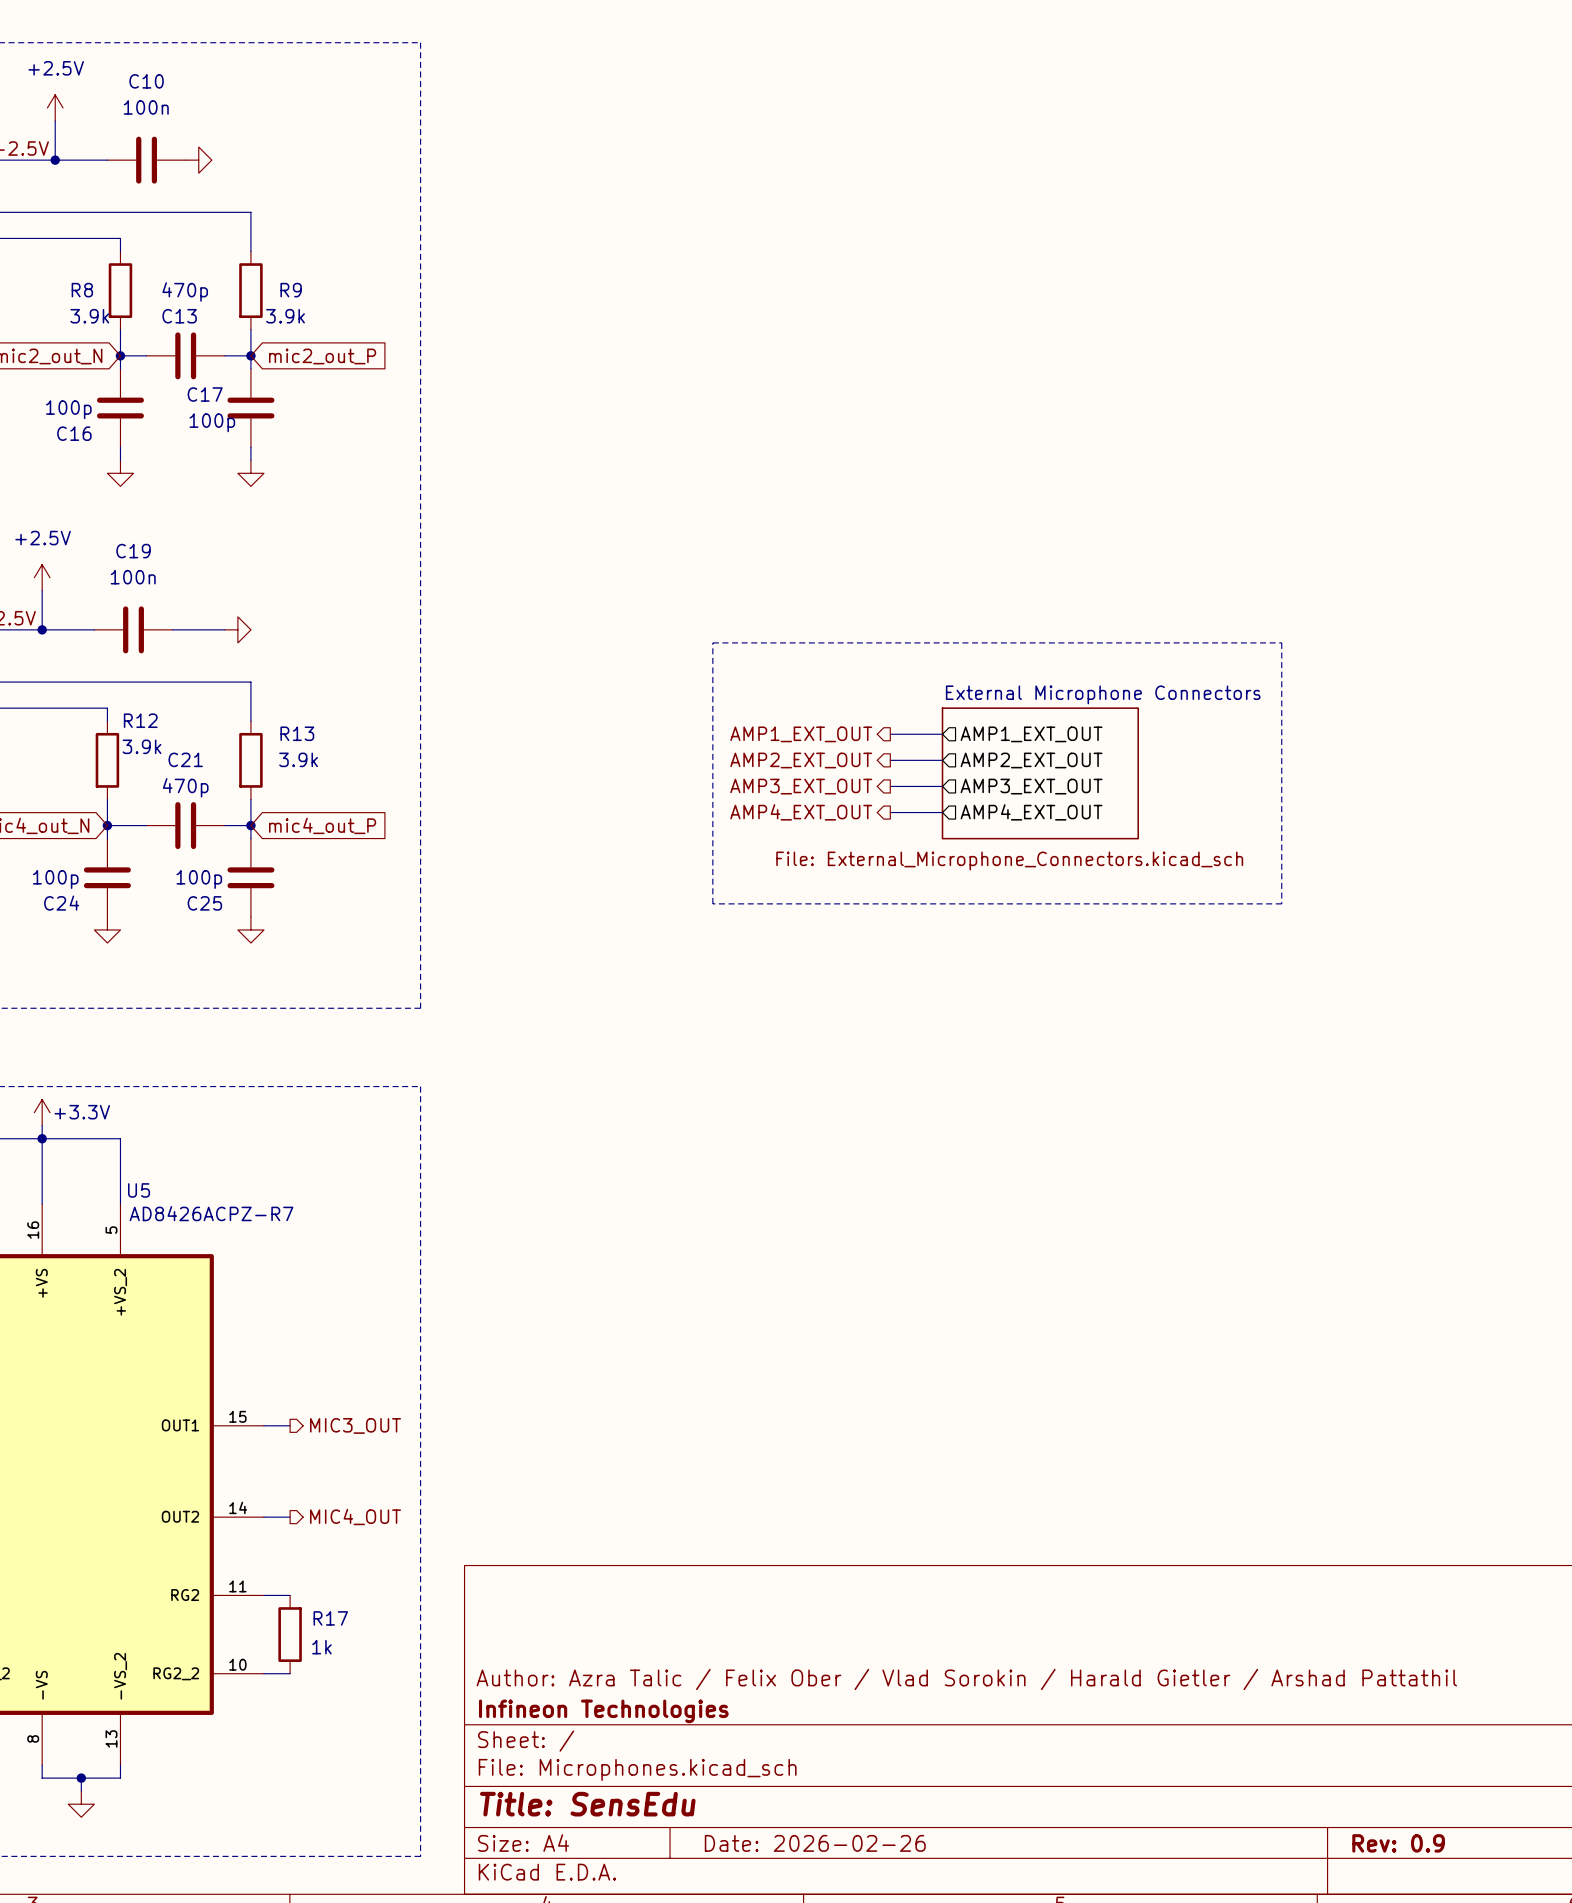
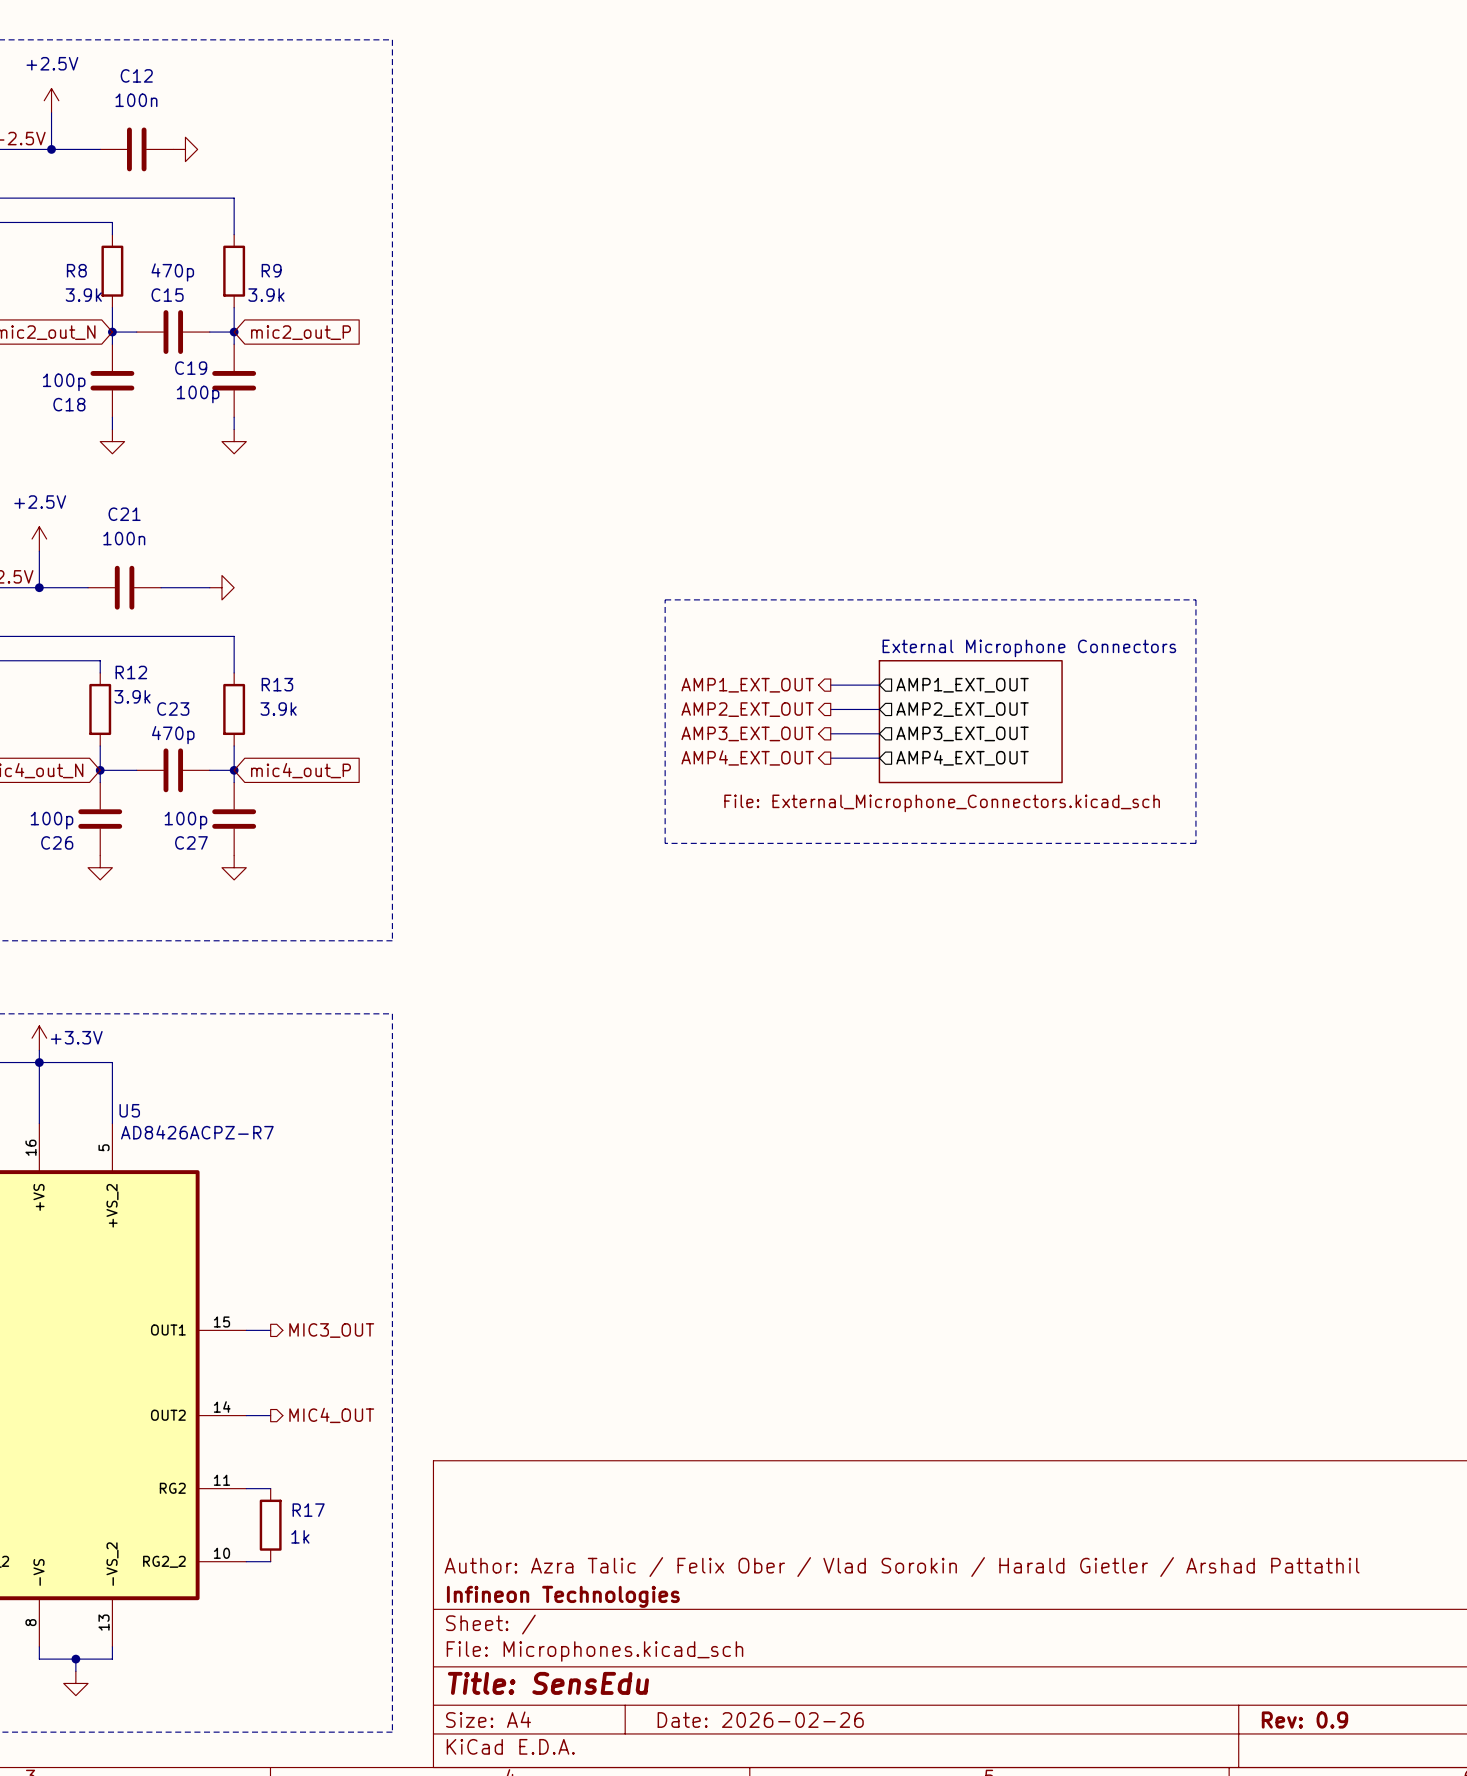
C10 name: C10 (146, 81) -> C12 (136, 75)
C13 name: C13 (179, 316) -> C15 (167, 295)
C17 name: C17 (205, 394) -> C19 (191, 368)
C16 name: C16 (74, 433) -> C18 (69, 404)
C19 name: C19 (133, 551) -> C21 (124, 514)
C21 name: C21 (185, 759) -> C23 (173, 709)
C24 name: C24 (61, 903) -> C26 (57, 842)
C25 name: C25 (204, 903) -> C27 (191, 842)

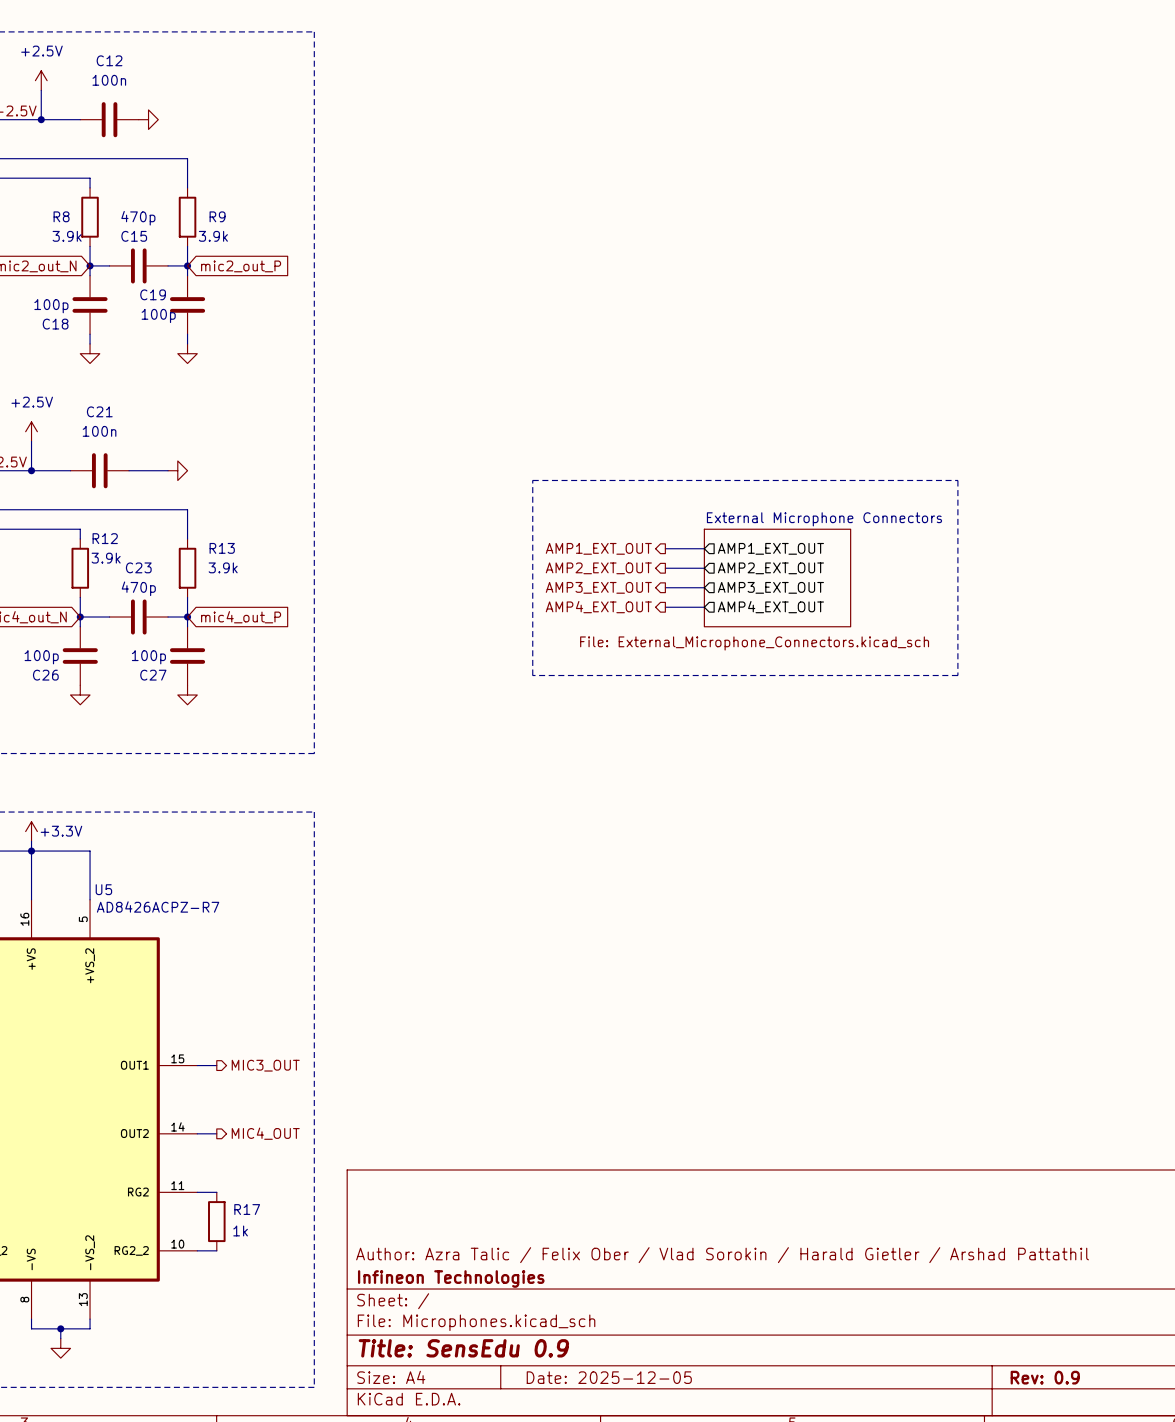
title block: Title: SensEdu (548, 1683) -> Title: SensEdu 0.9 (463, 1348)
title block: Date: 2026-02-26 (760, 1720) -> Date: 2025-12-05 (609, 1377)

